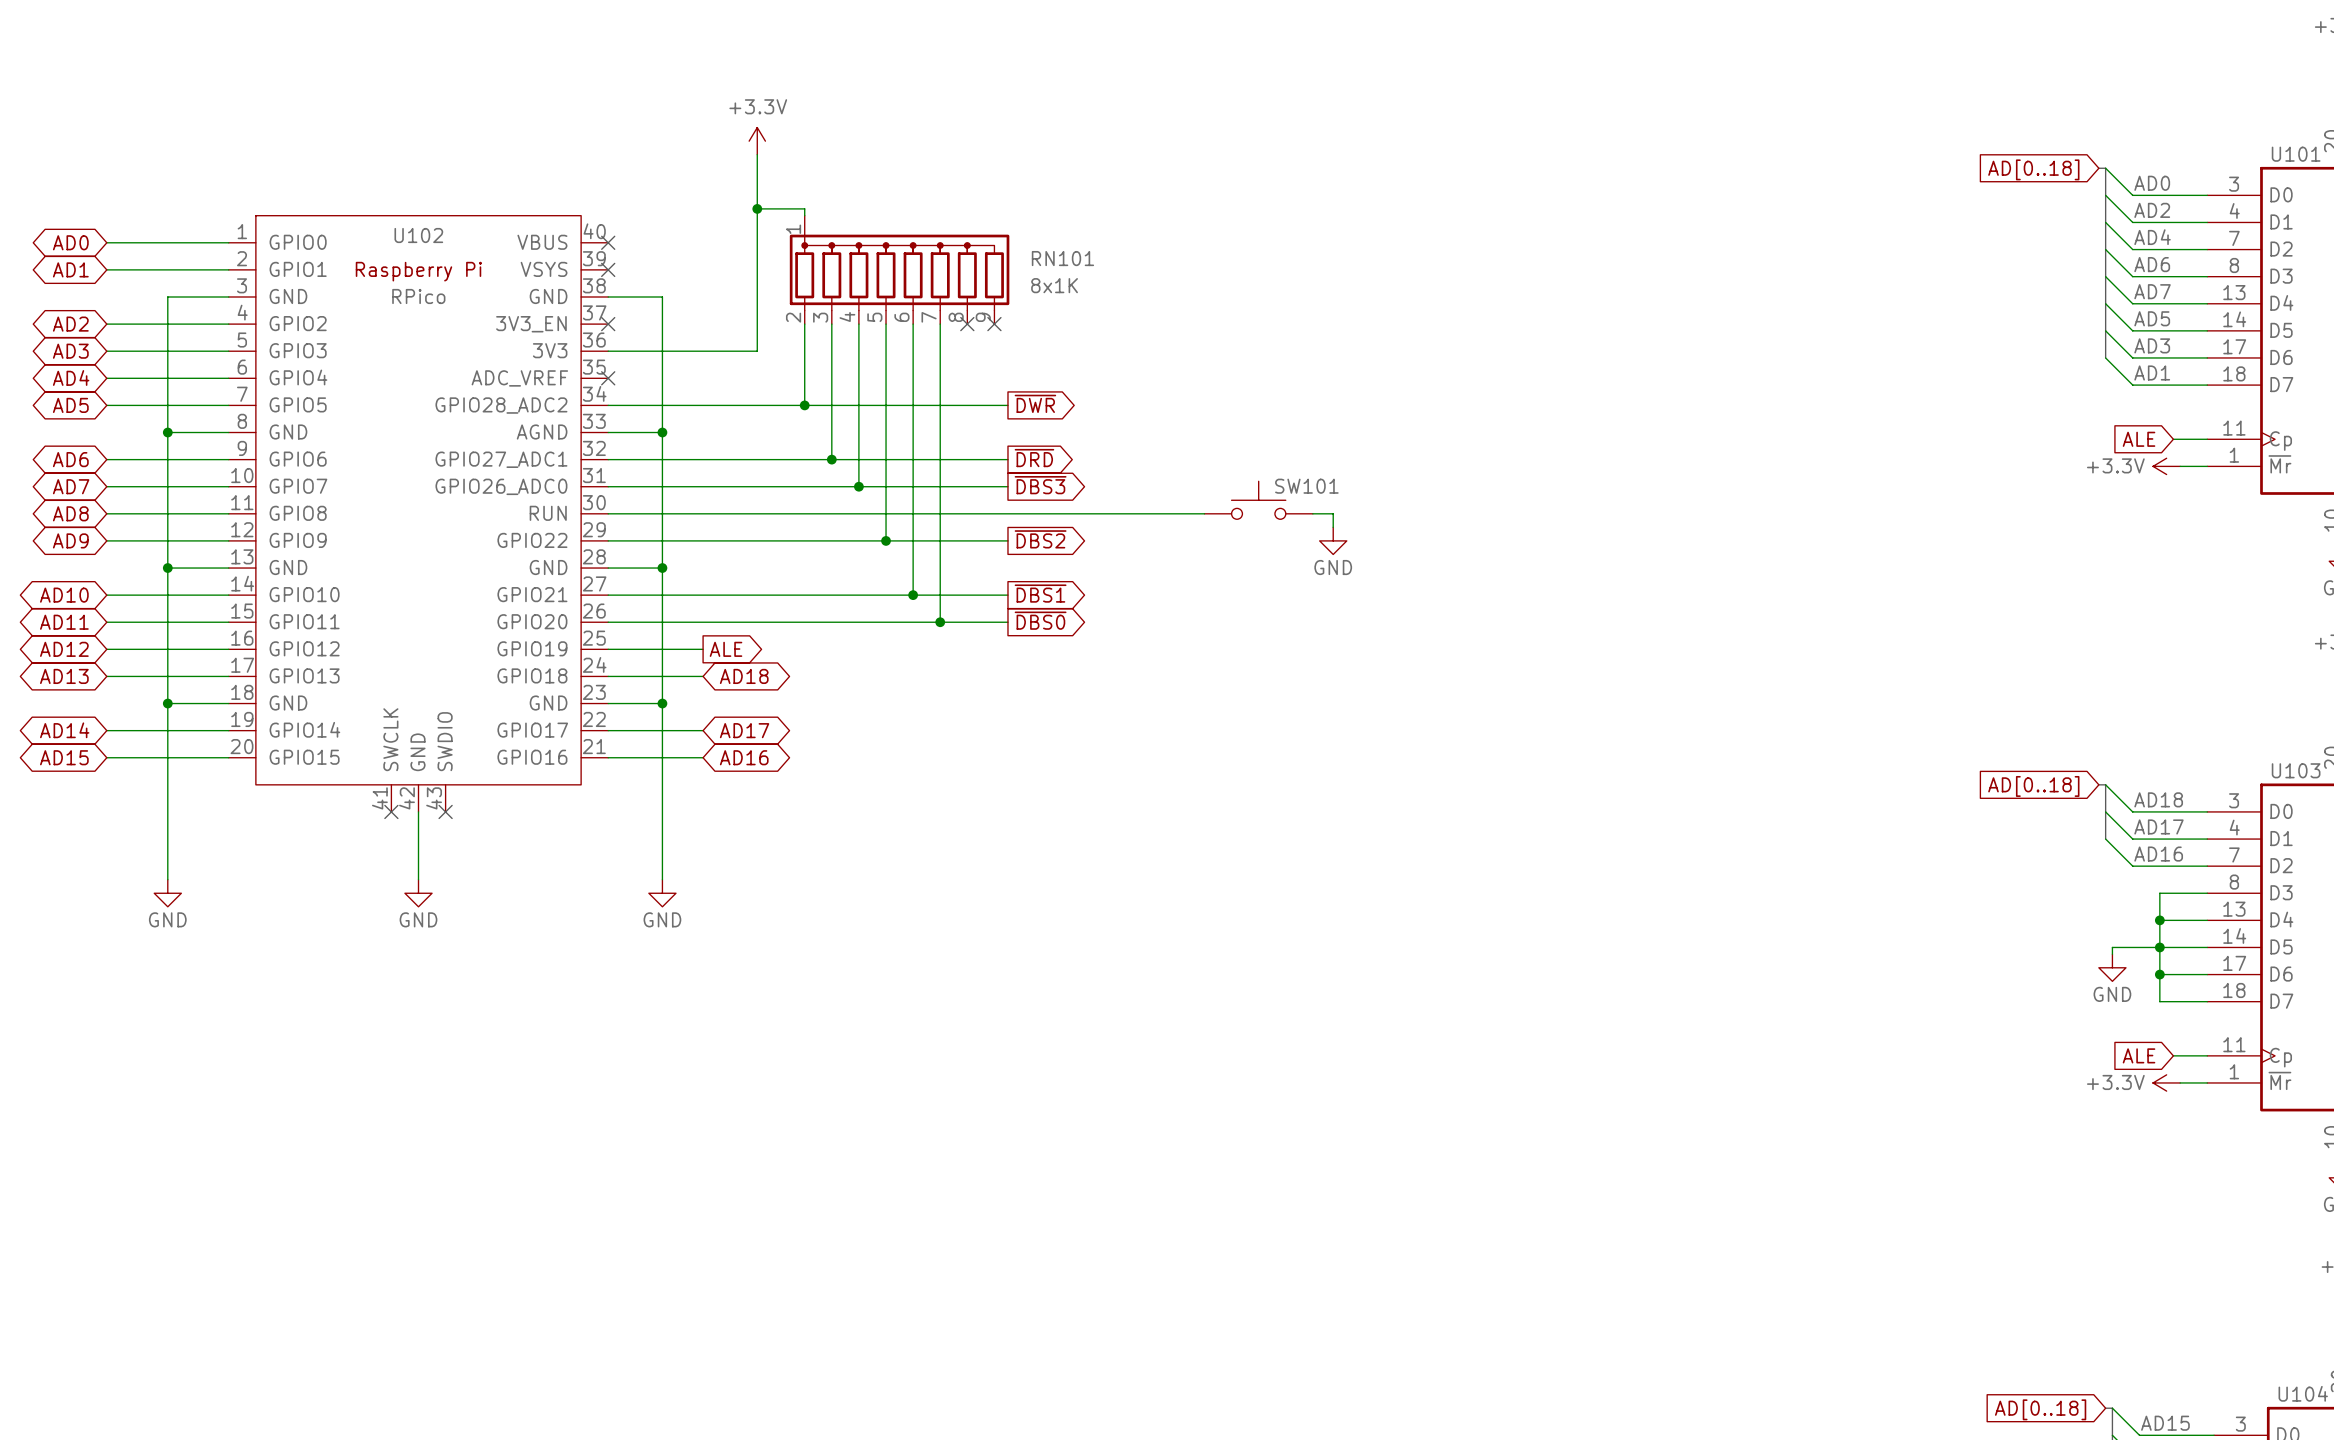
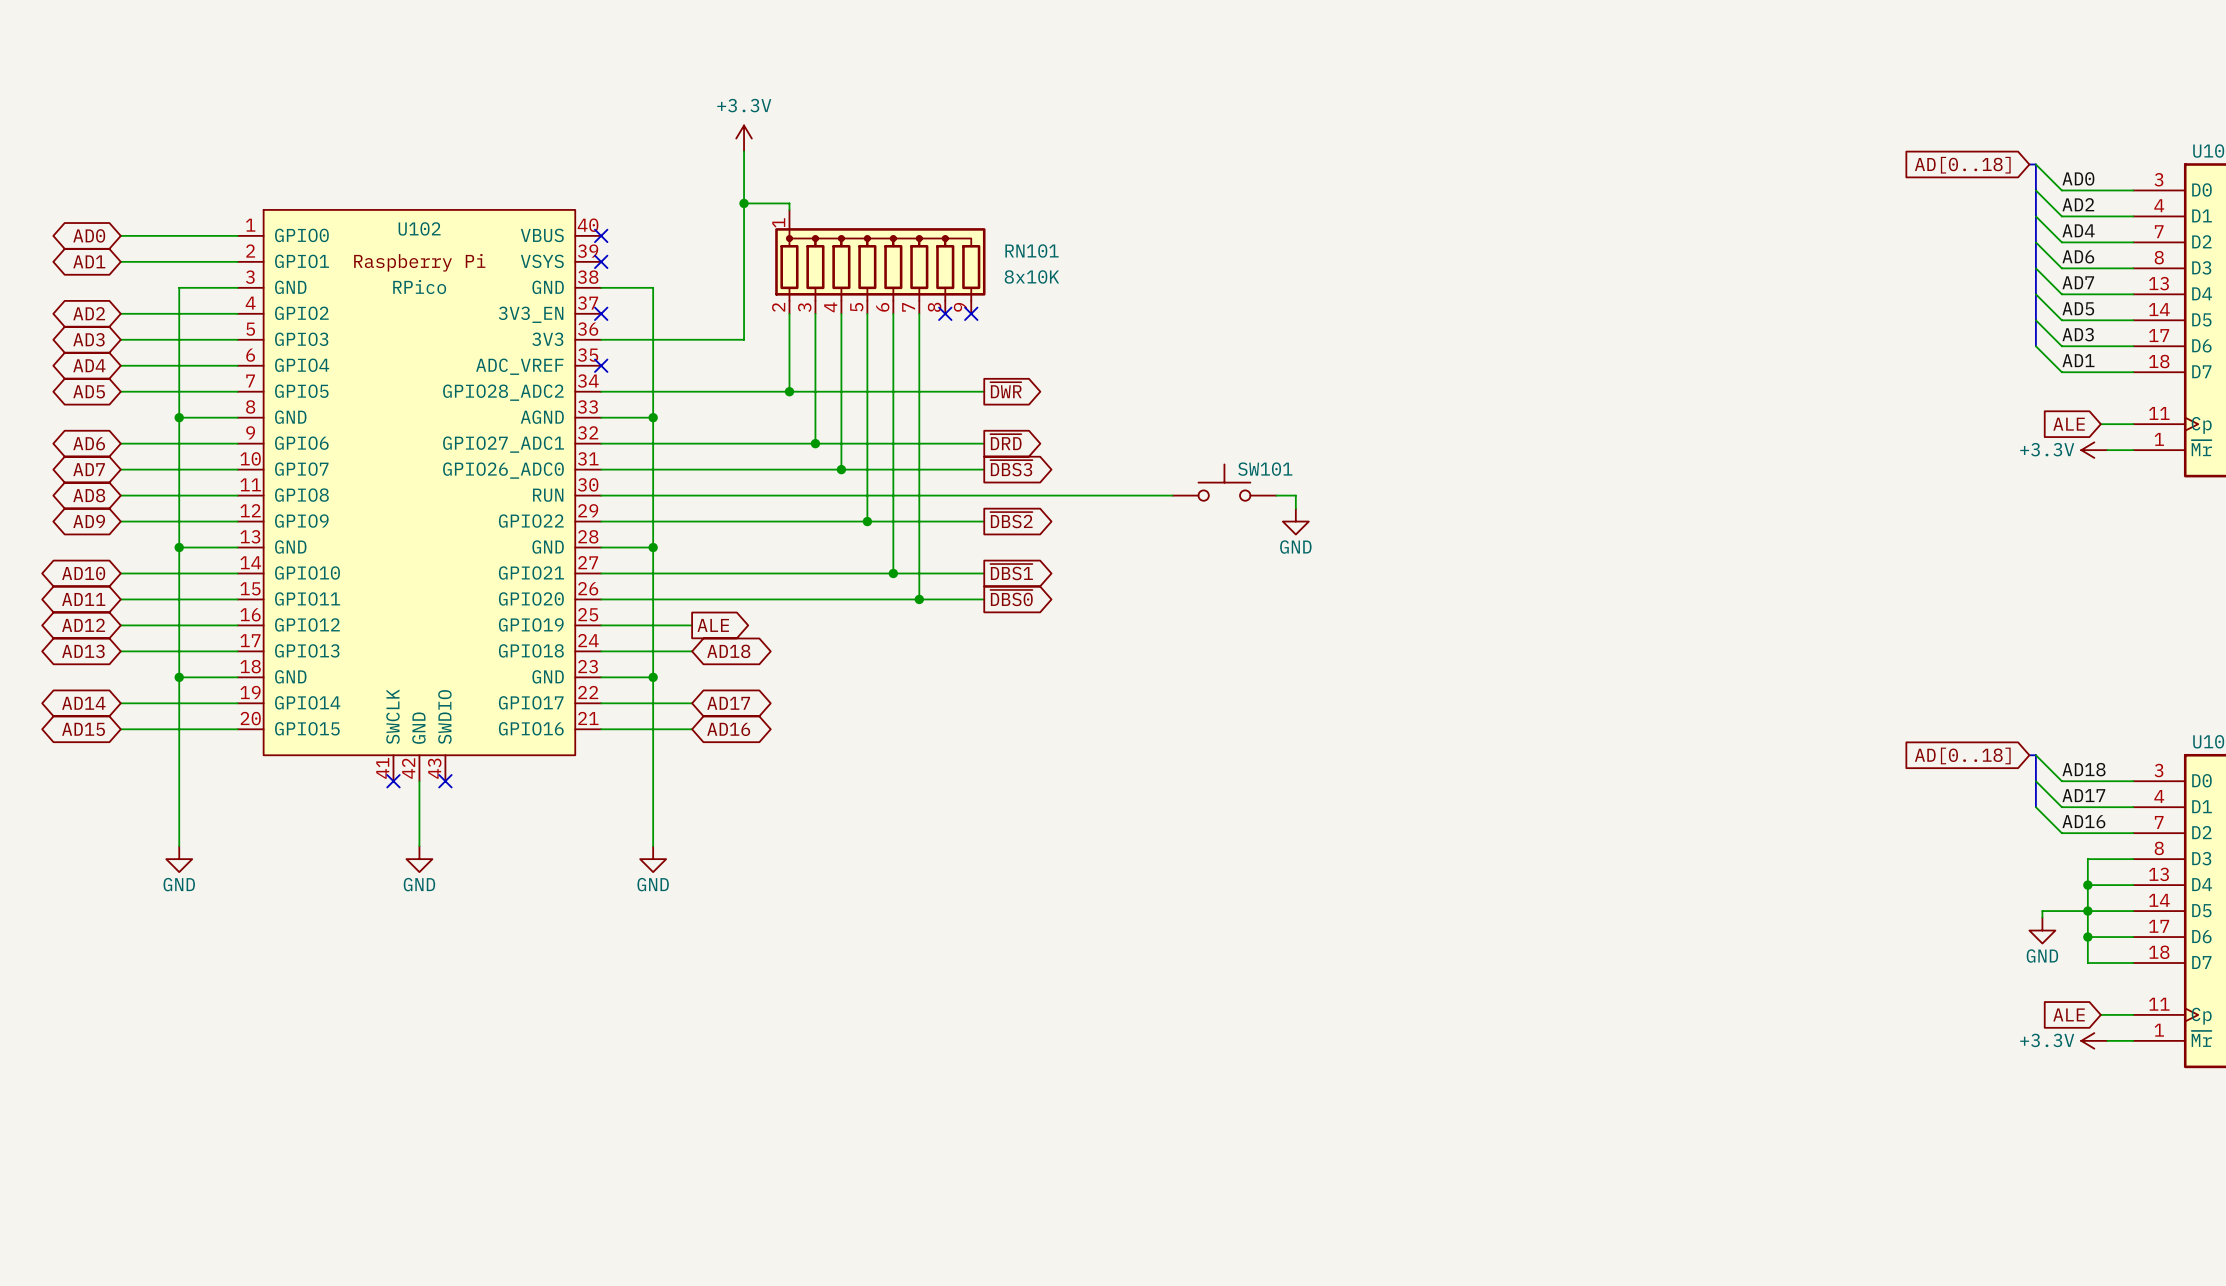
RN101 value: 8x1K (1054, 285) -> 8x10K (1031, 276)

